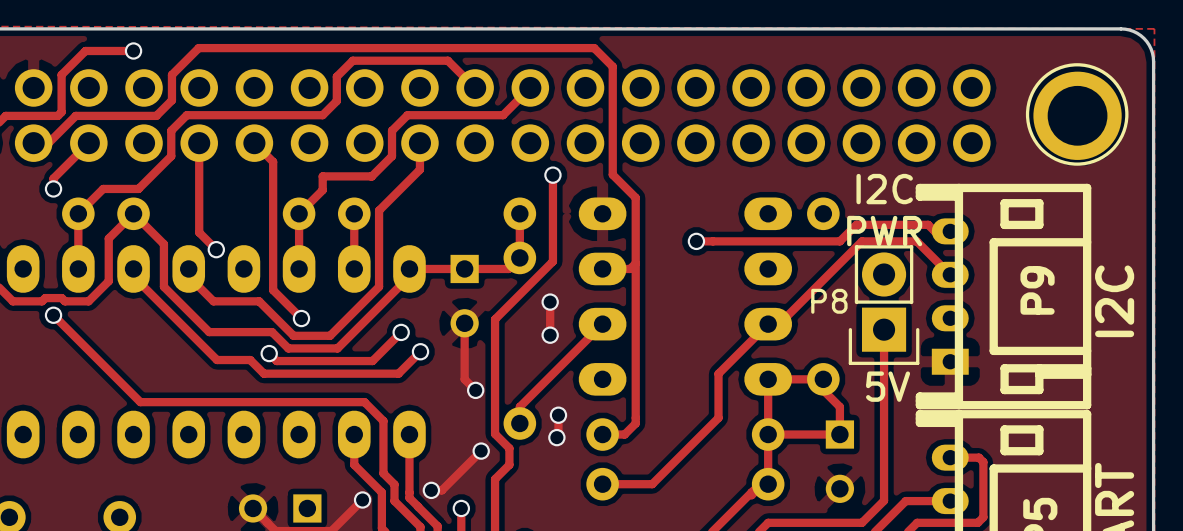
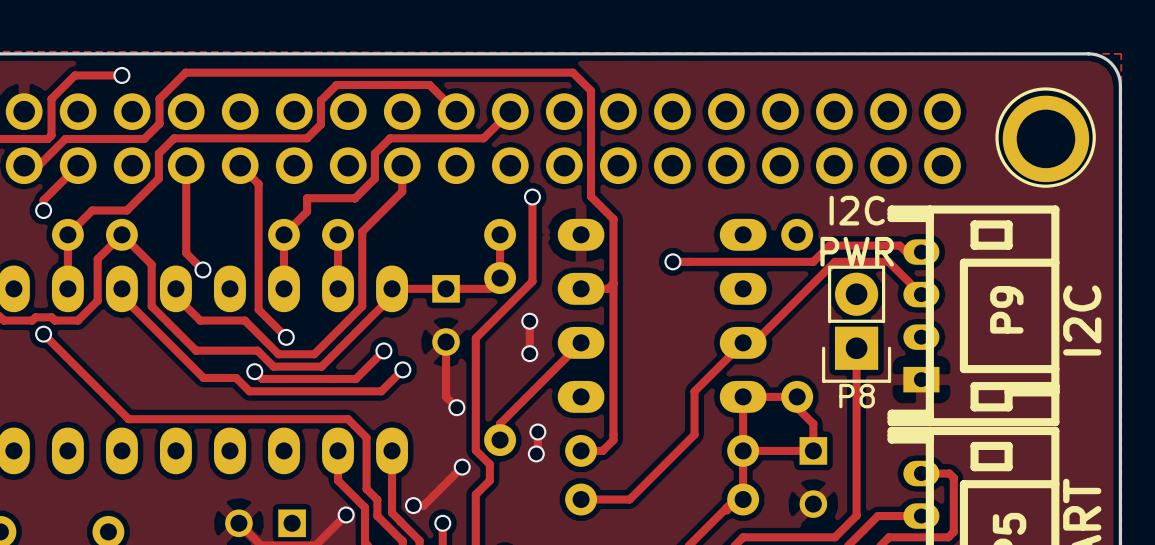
P8 name position: P8 (829, 301) -> P8 (857, 396)
text: 5V (888, 386) -> none

